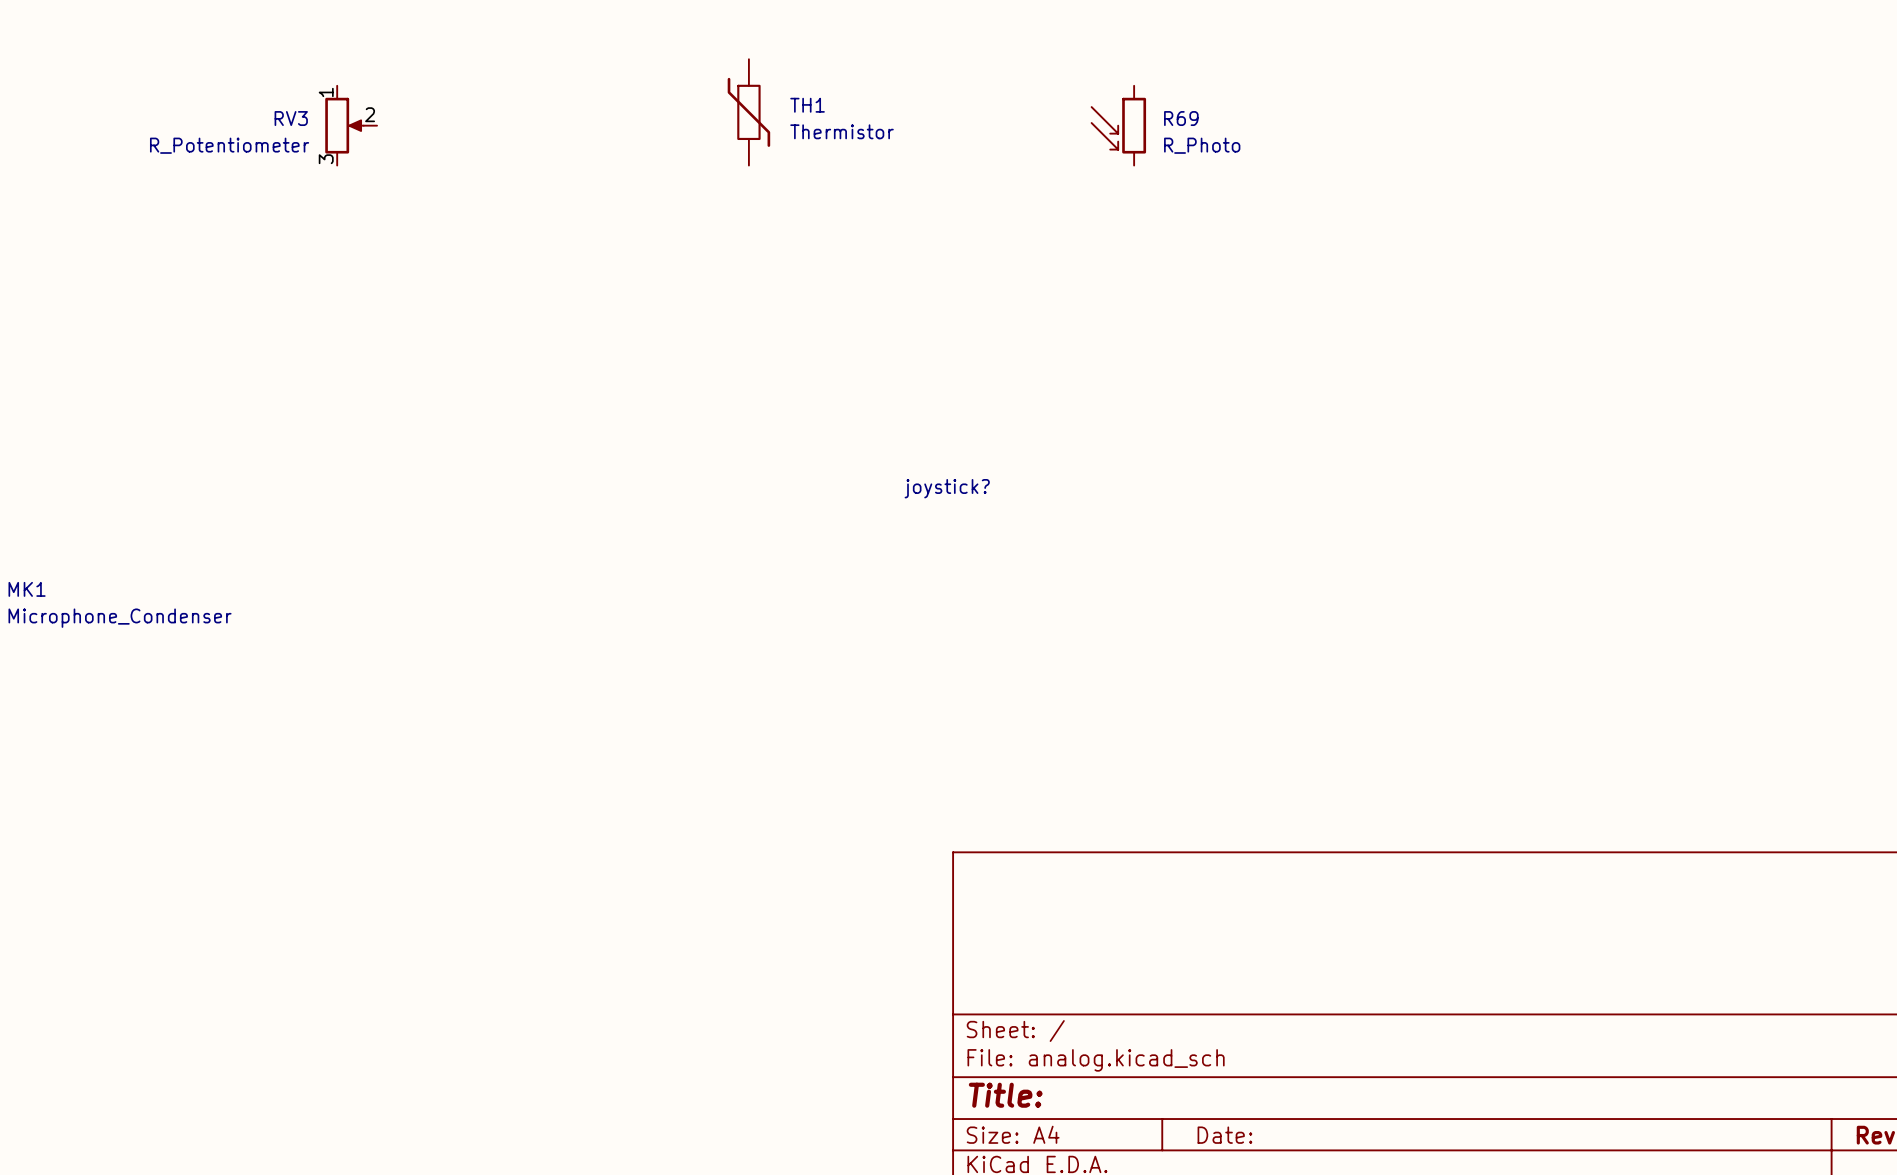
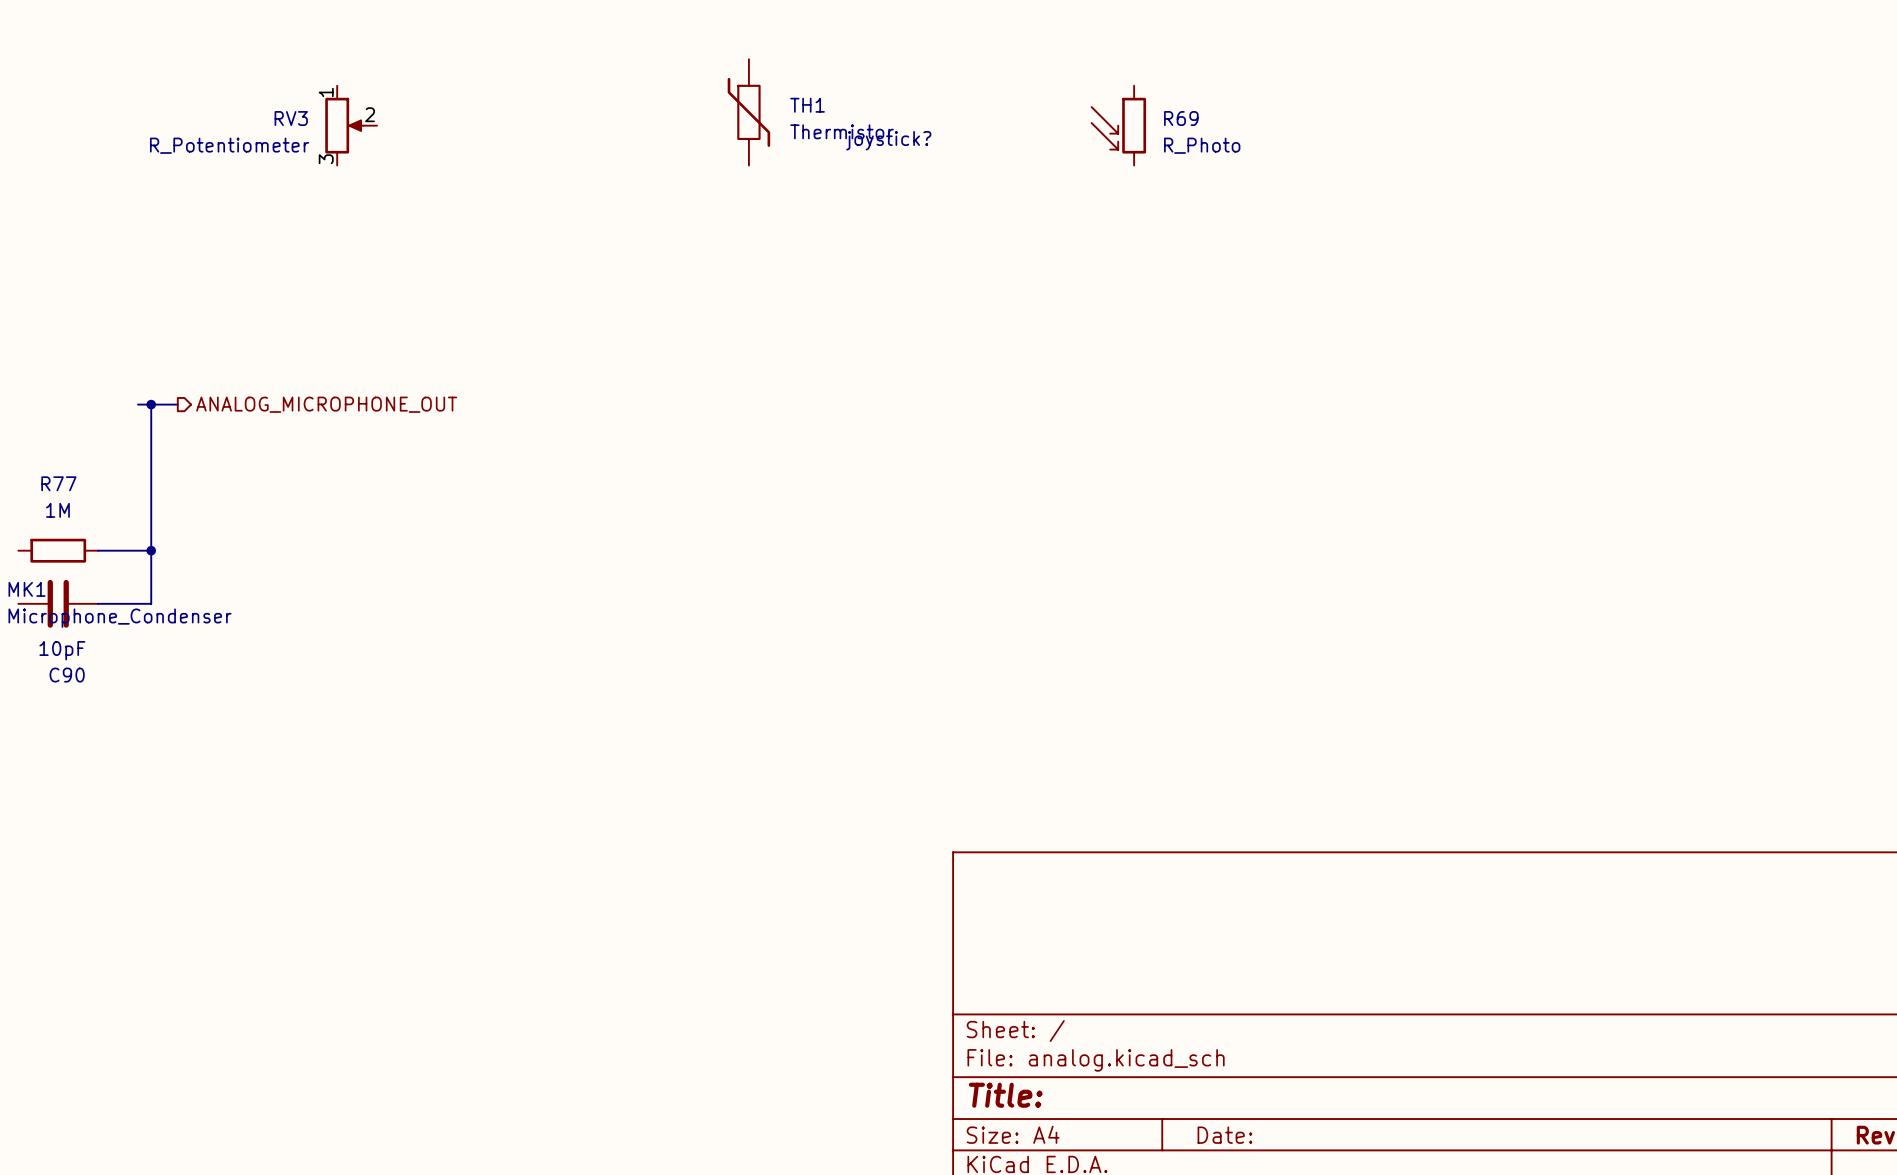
text: none -> joystick? (888, 140)
wire: none -> (137, 404) (177, 404)
wire: none -> (151, 404) (151, 603) (98, 603)
junction: none -> (151, 404)
hierarchical label: none -> ANALOG_MICROPHONE_OUT (326, 404)
text: joystick? (947, 488) -> none
R77: none -> 1M (58, 550)
wire: none -> (98, 550) (151, 550)
junction: none -> (151, 550)
C90: none -> 10pF (58, 603)

